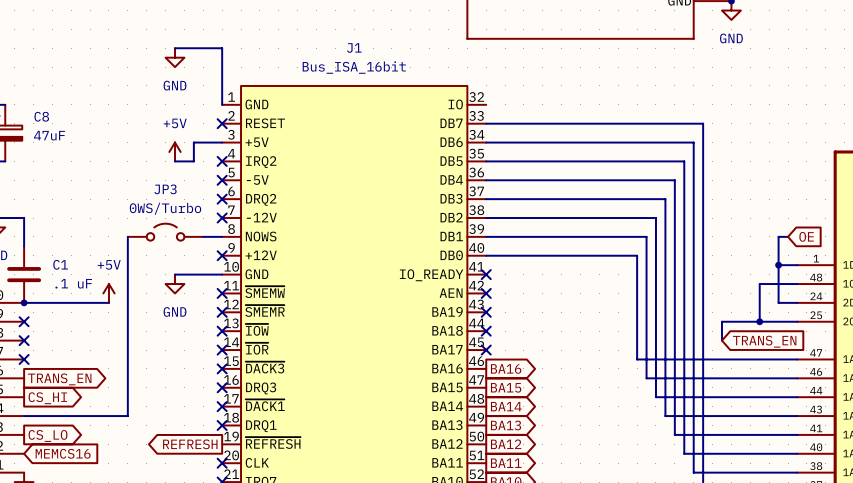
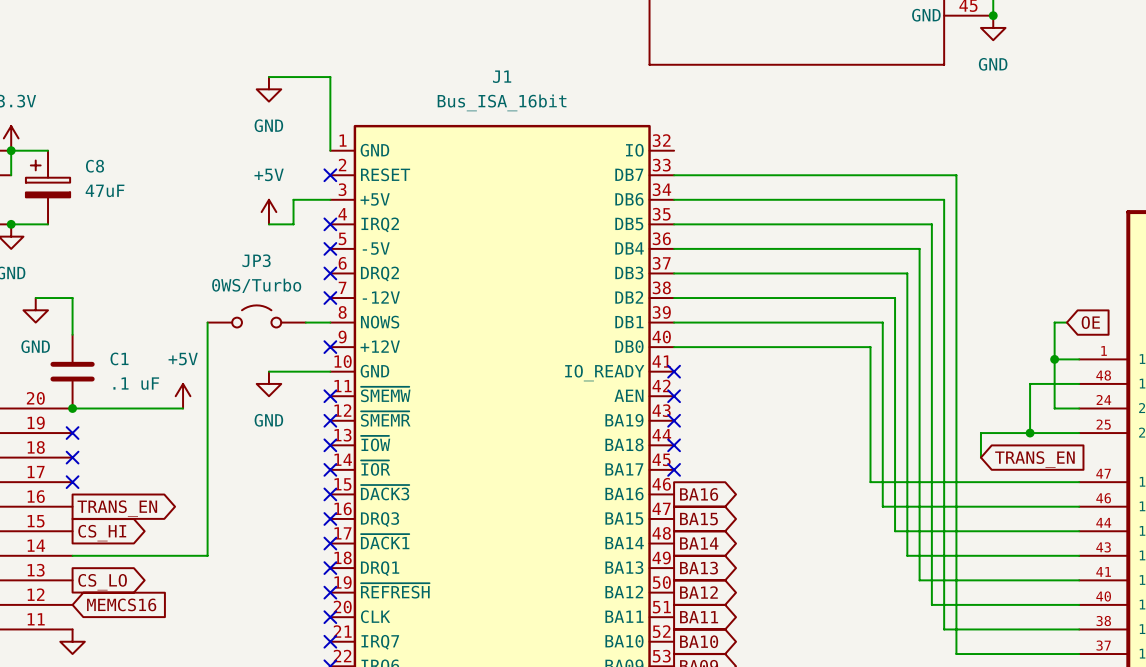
global label: REFRESH (190, 444) -> none
no-connect mark: none -> (330, 592)

